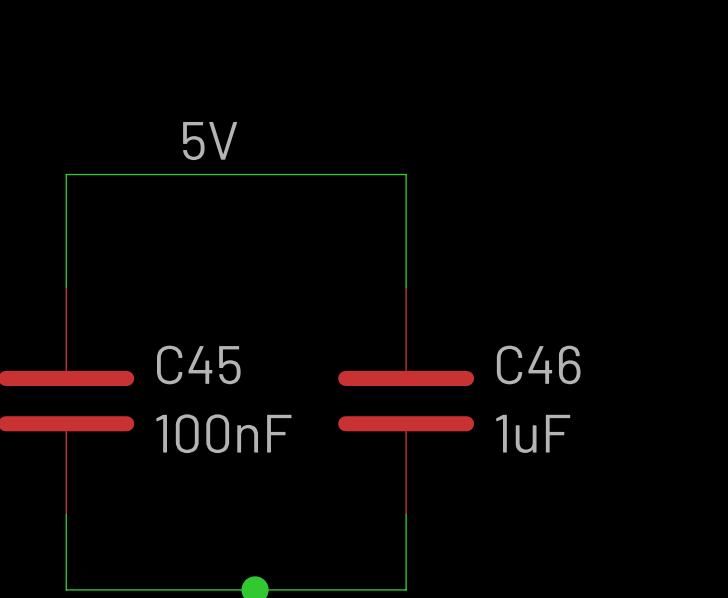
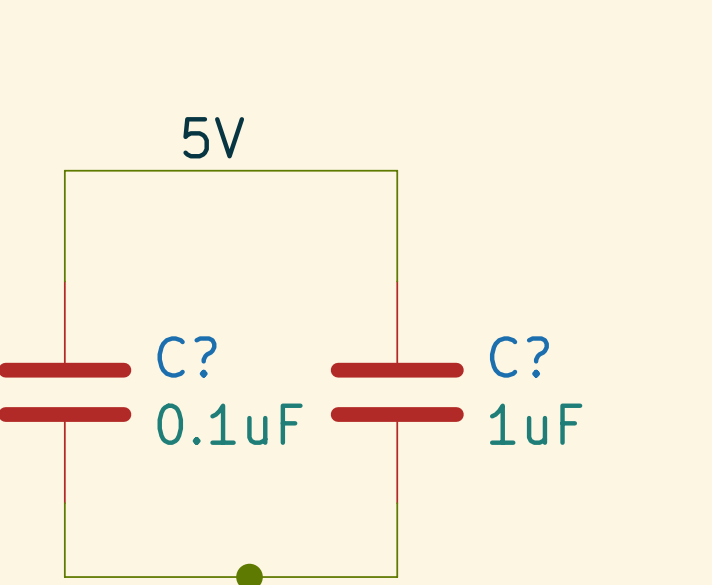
C45 name: C45 (198, 364) -> C? (186, 356)
C46 name: C46 (538, 364) -> C? (519, 356)
C45 value: 100nF (223, 433) -> 0.1uF (230, 424)

